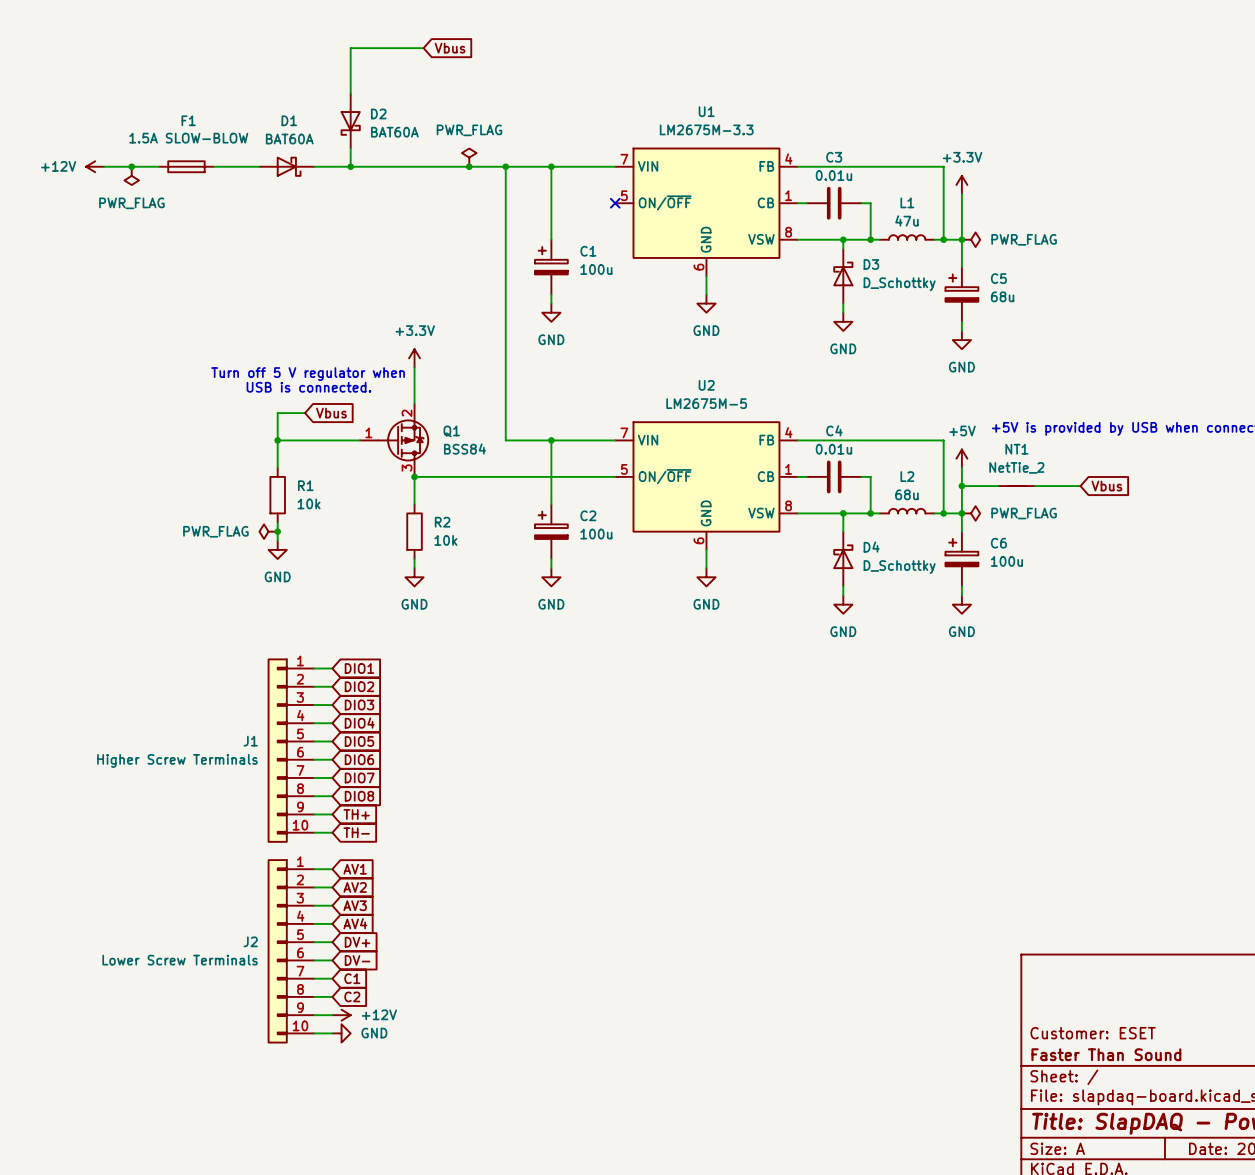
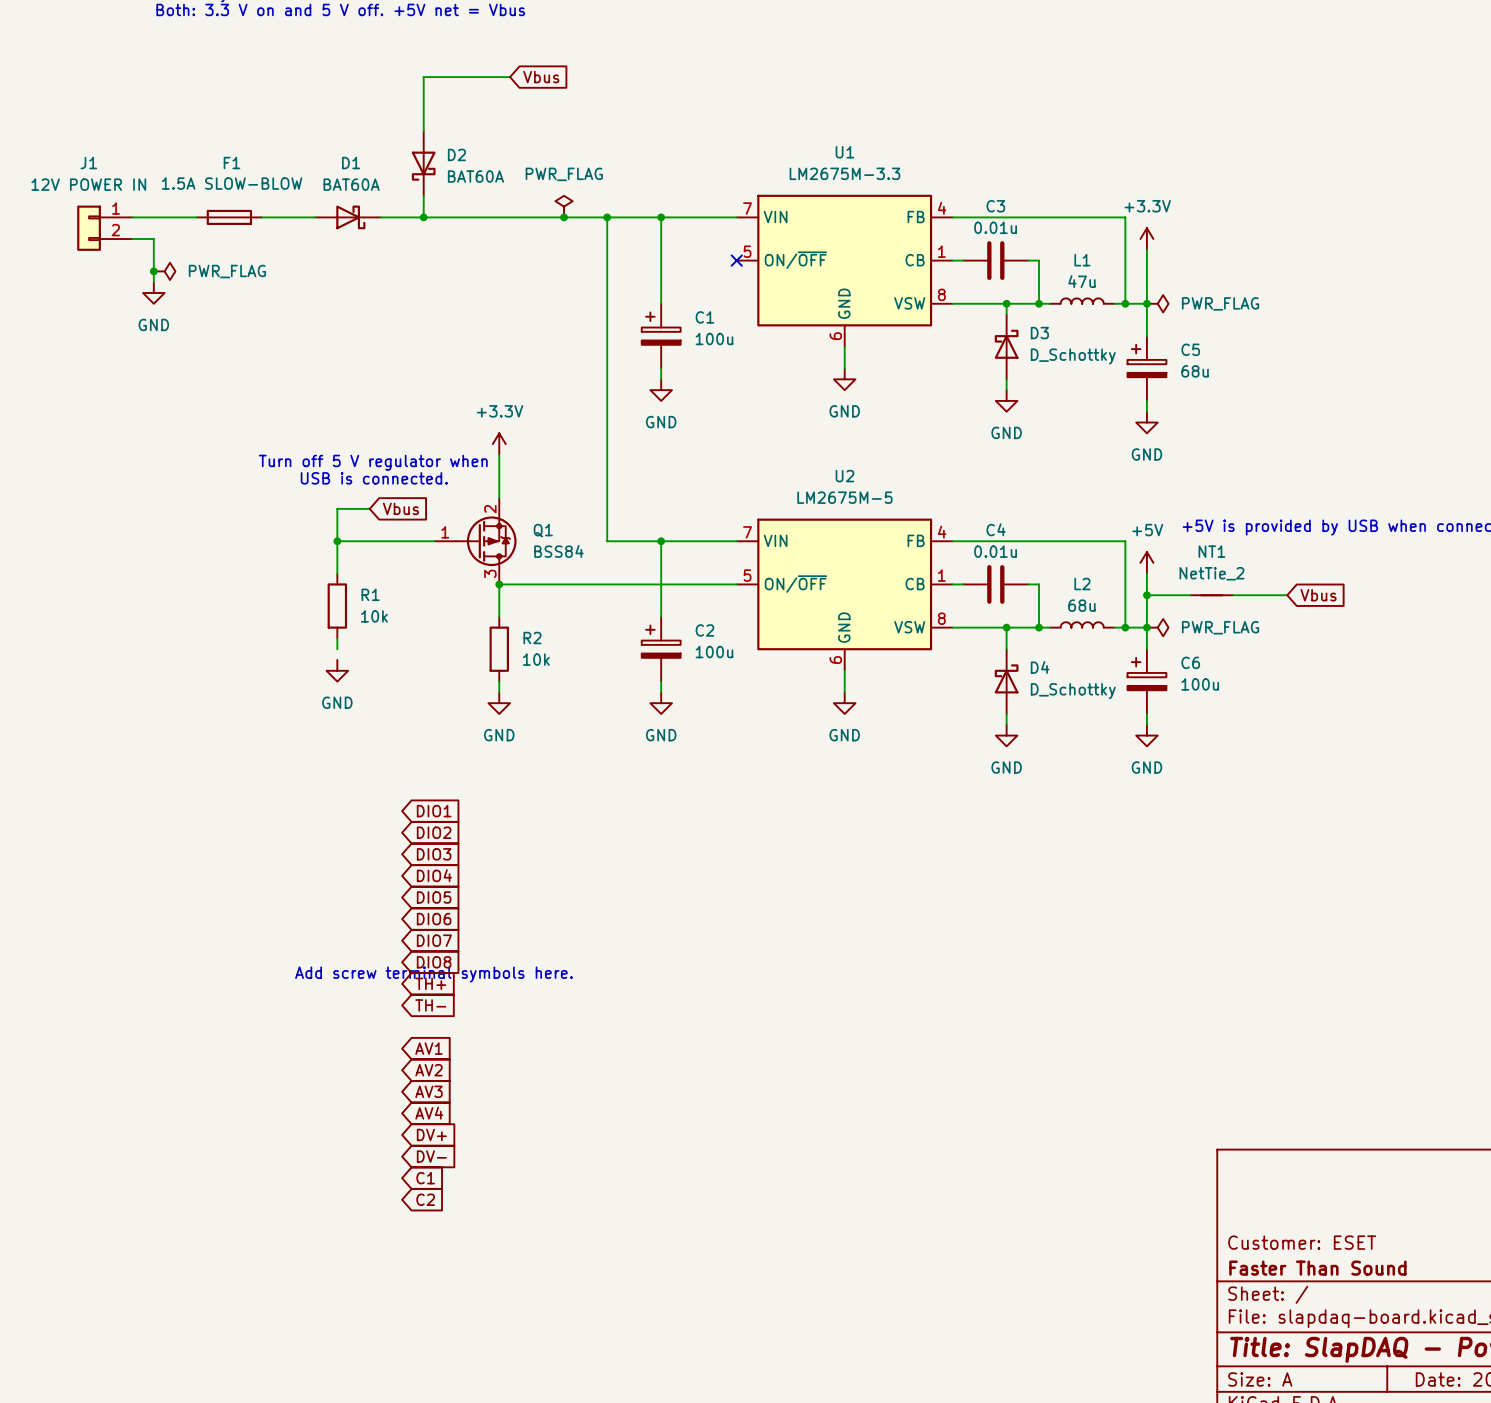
power symbol: +12V (95, 166) -> none
junction: (131, 166) -> none
power symbol rotation: 0° (131, 175) -> 90° counterclockwise (164, 271)
power symbol position: PWR_FLAG (131, 175) -> PWR_FLAG (164, 271)
wire: none -> (132, 239) (153, 239) (153, 282)
power symbol text position: PWR_FLAG (131, 203) -> PWR_FLAG (227, 271)
junction: none -> (153, 271)
power symbol: none -> GND (153, 292)
power symbol: PWR_FLAG (268, 531) -> none
wire: (277, 531) (277, 540) -> none
junction: (277, 531) -> none
J1 symbol: [267, 658, 315, 843] -> [77, 205, 133, 251]
wire: (314, 668) (332, 668) -> none
wire: (314, 686) (332, 686) -> none
wire: (314, 705) (332, 705) -> none
wire: (314, 723) (332, 723) -> none
J1 name position: J1 (250, 741) -> J1 (88, 163)
wire: (314, 741) (332, 741) -> none
wire: (314, 759) (332, 759) -> none
J1 value: Higher Screw Terminals (177, 760) -> 12V POWER IN (88, 184)
wire: (314, 777) (332, 777) -> none
wire: (314, 796) (332, 796) -> none
text: none -> Add screw terminal symbols here. (433, 974)
wire: (314, 814) (332, 814) -> none
wire: (314, 832) (332, 832) -> none
wire: (314, 869) (332, 869) -> none
wire: (314, 887) (332, 887) -> none
wire: (314, 905) (332, 905) -> none
wire: (314, 923) (332, 923) -> none
wire: (314, 942) (332, 942) -> none
J2: Lower Screw Terminals (290, 951) -> none
wire: (314, 960) (332, 960) -> none
wire: (314, 978) (332, 978) -> none
wire: (314, 996) (332, 996) -> none
wire: (314, 1015) (332, 1015) -> none
power symbol: +12V (341, 1015) -> none
wire: (314, 1033) (332, 1033) -> none
power symbol: GND (341, 1033) -> none

